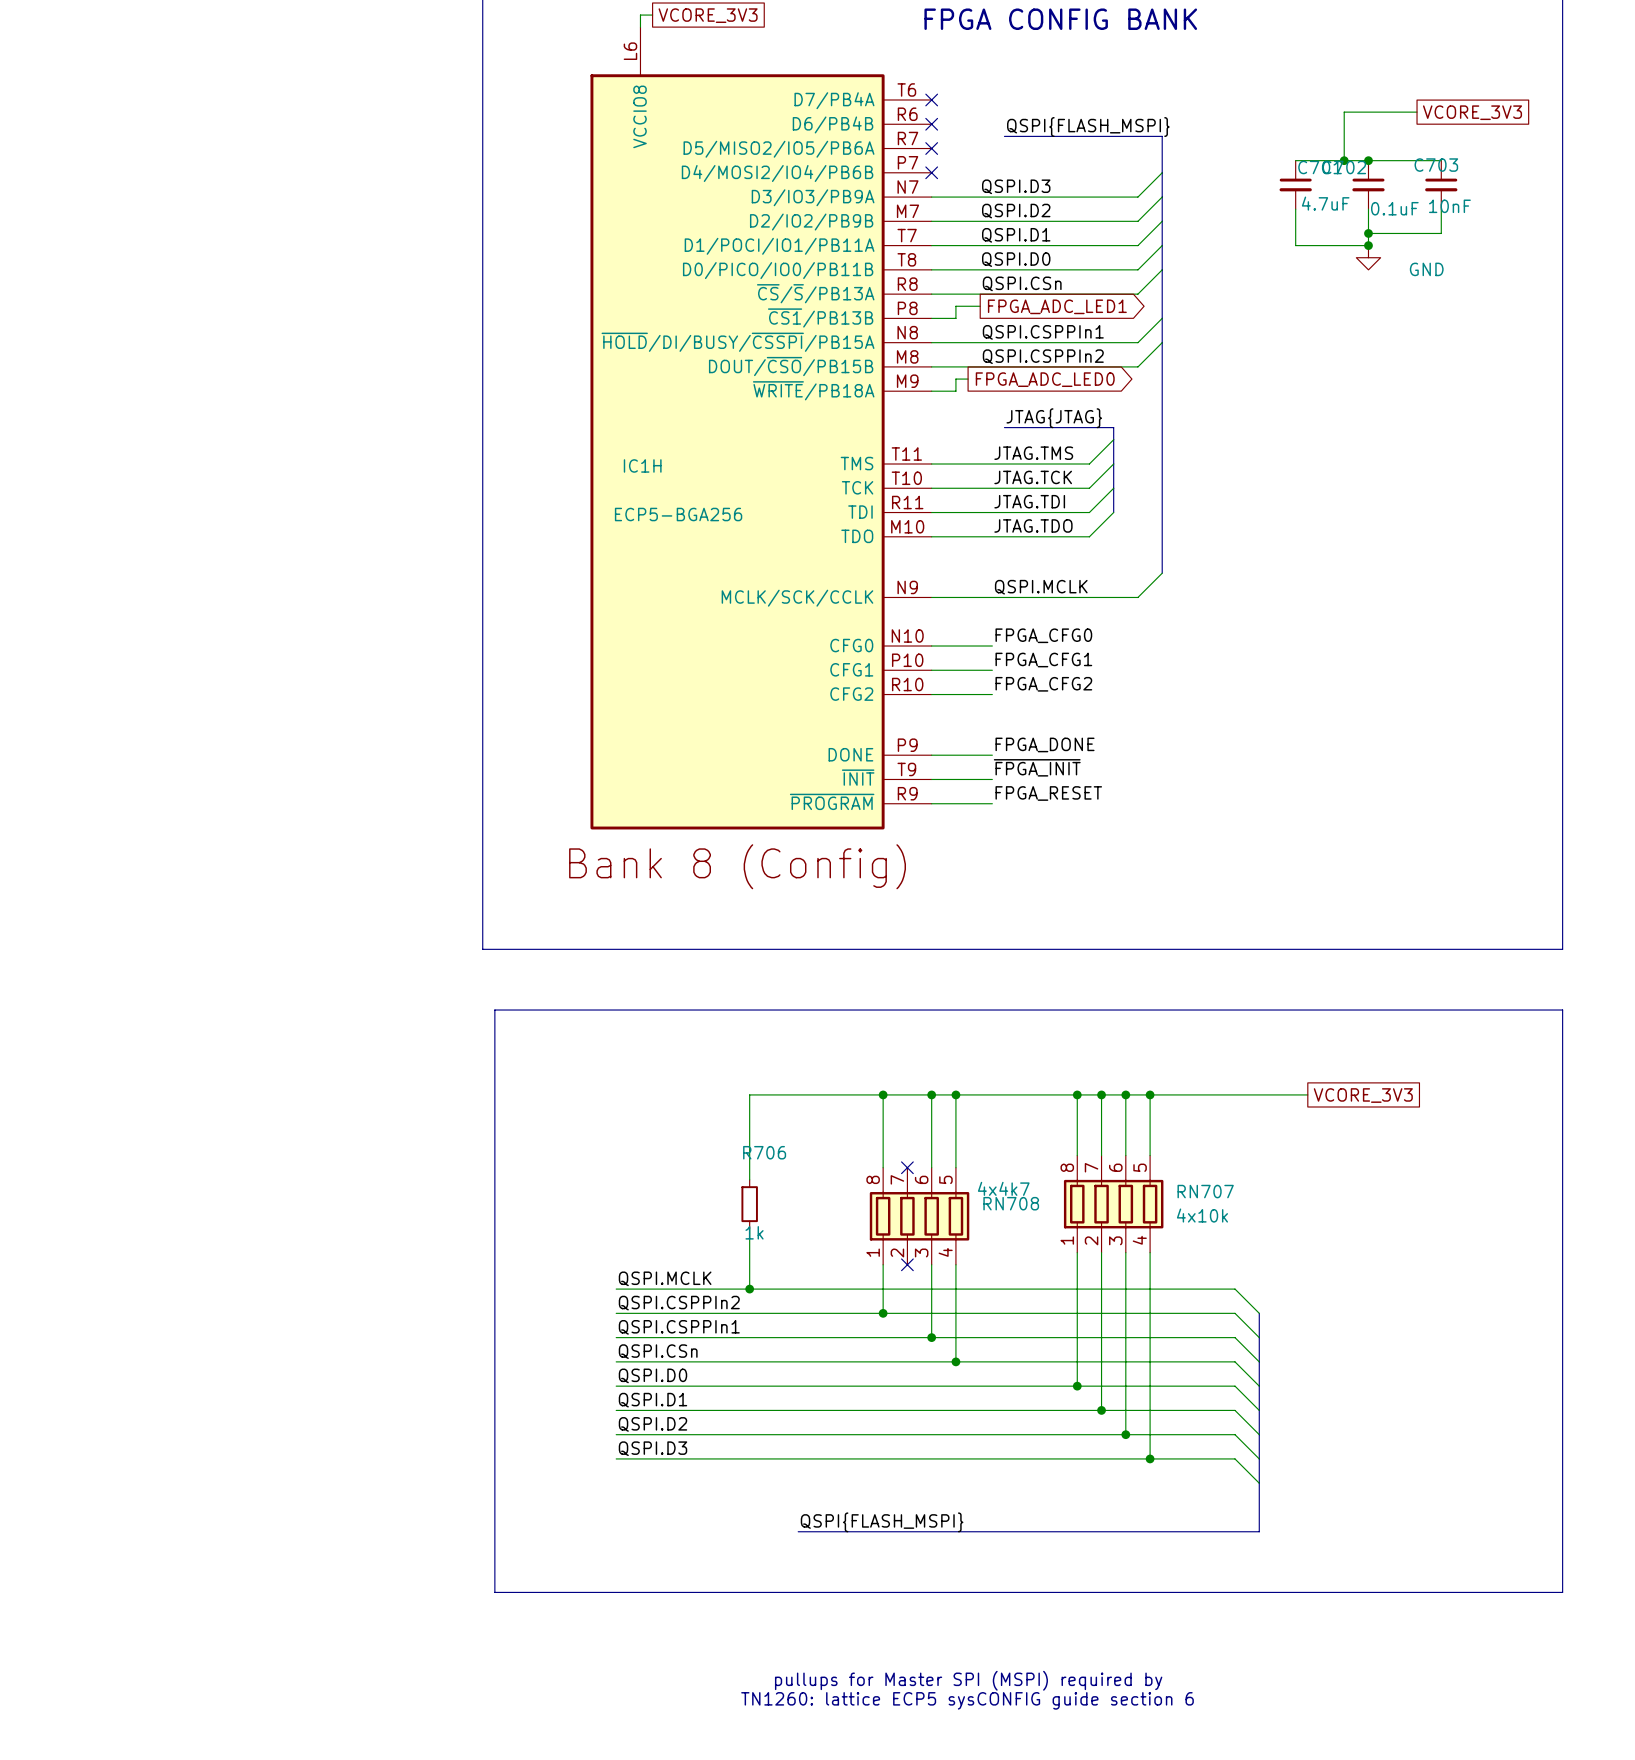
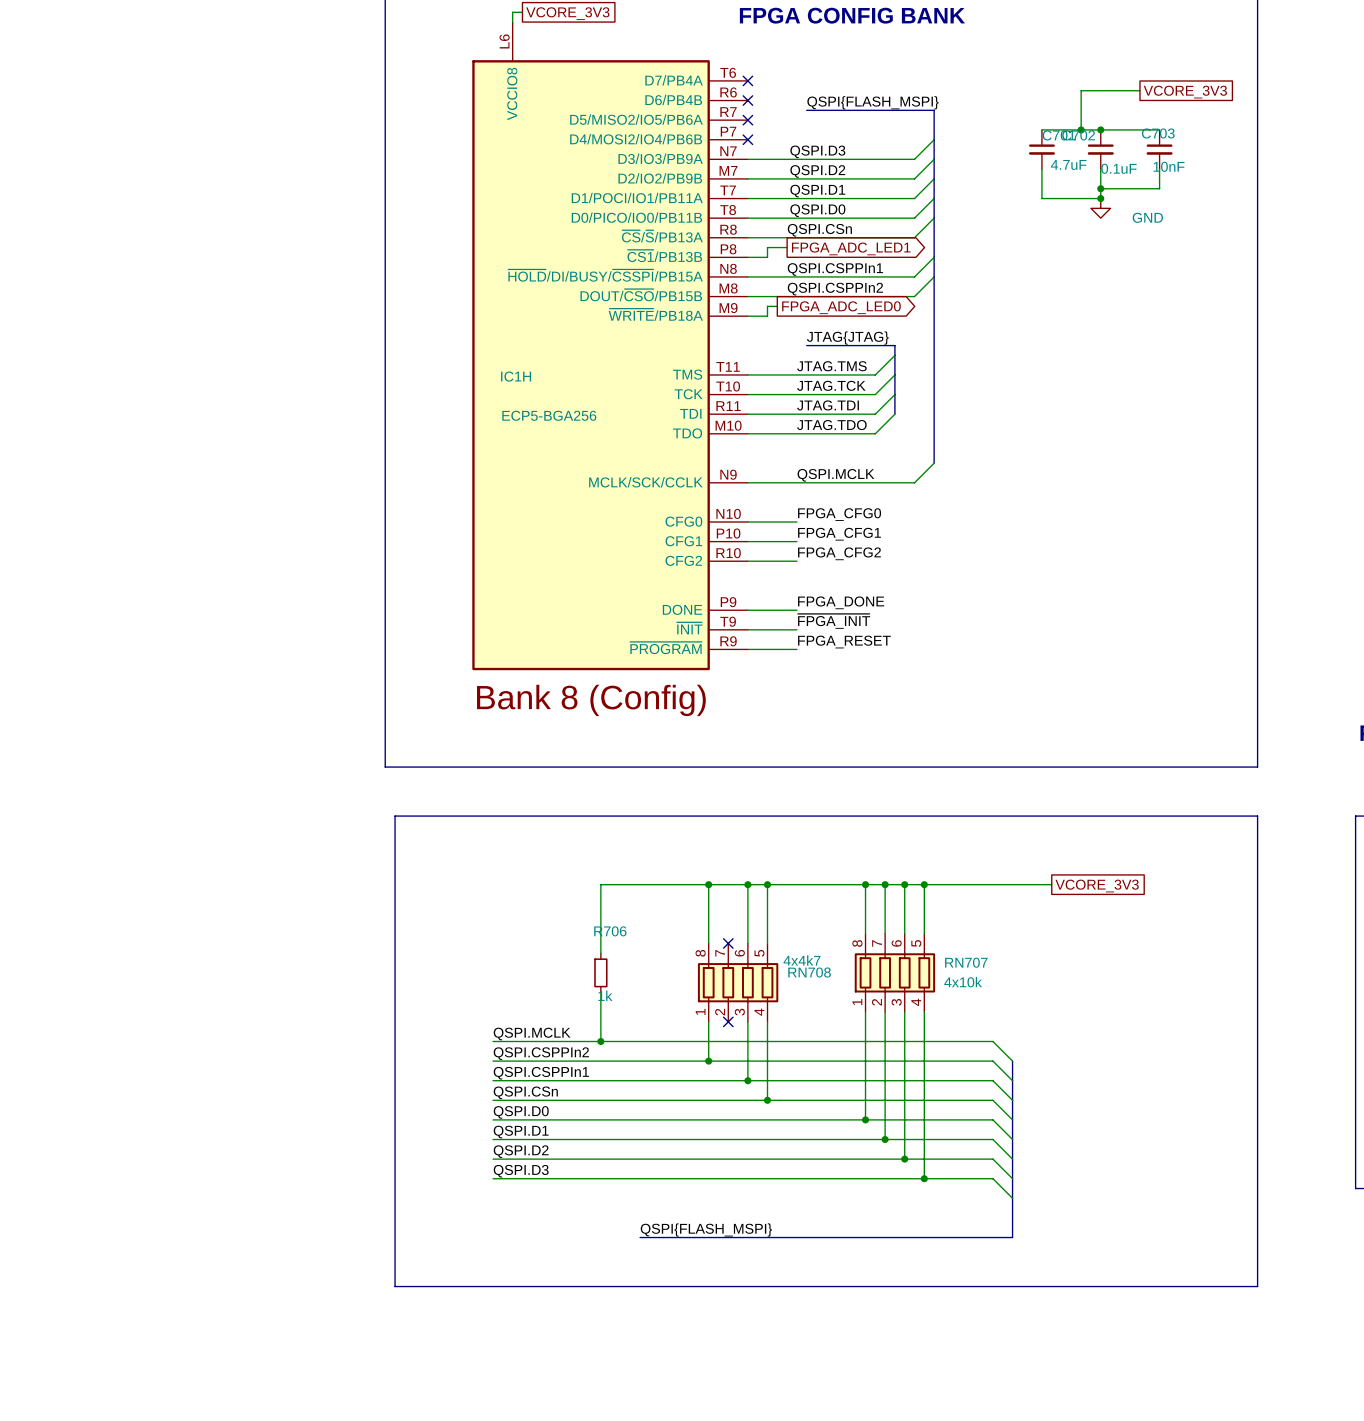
text: pullups for Master SPI (MSPI) required by (968, 1680) -> none
text: TN1260: lattice ECP5 sysCONFIG guide section 6 (967, 1700) -> none

